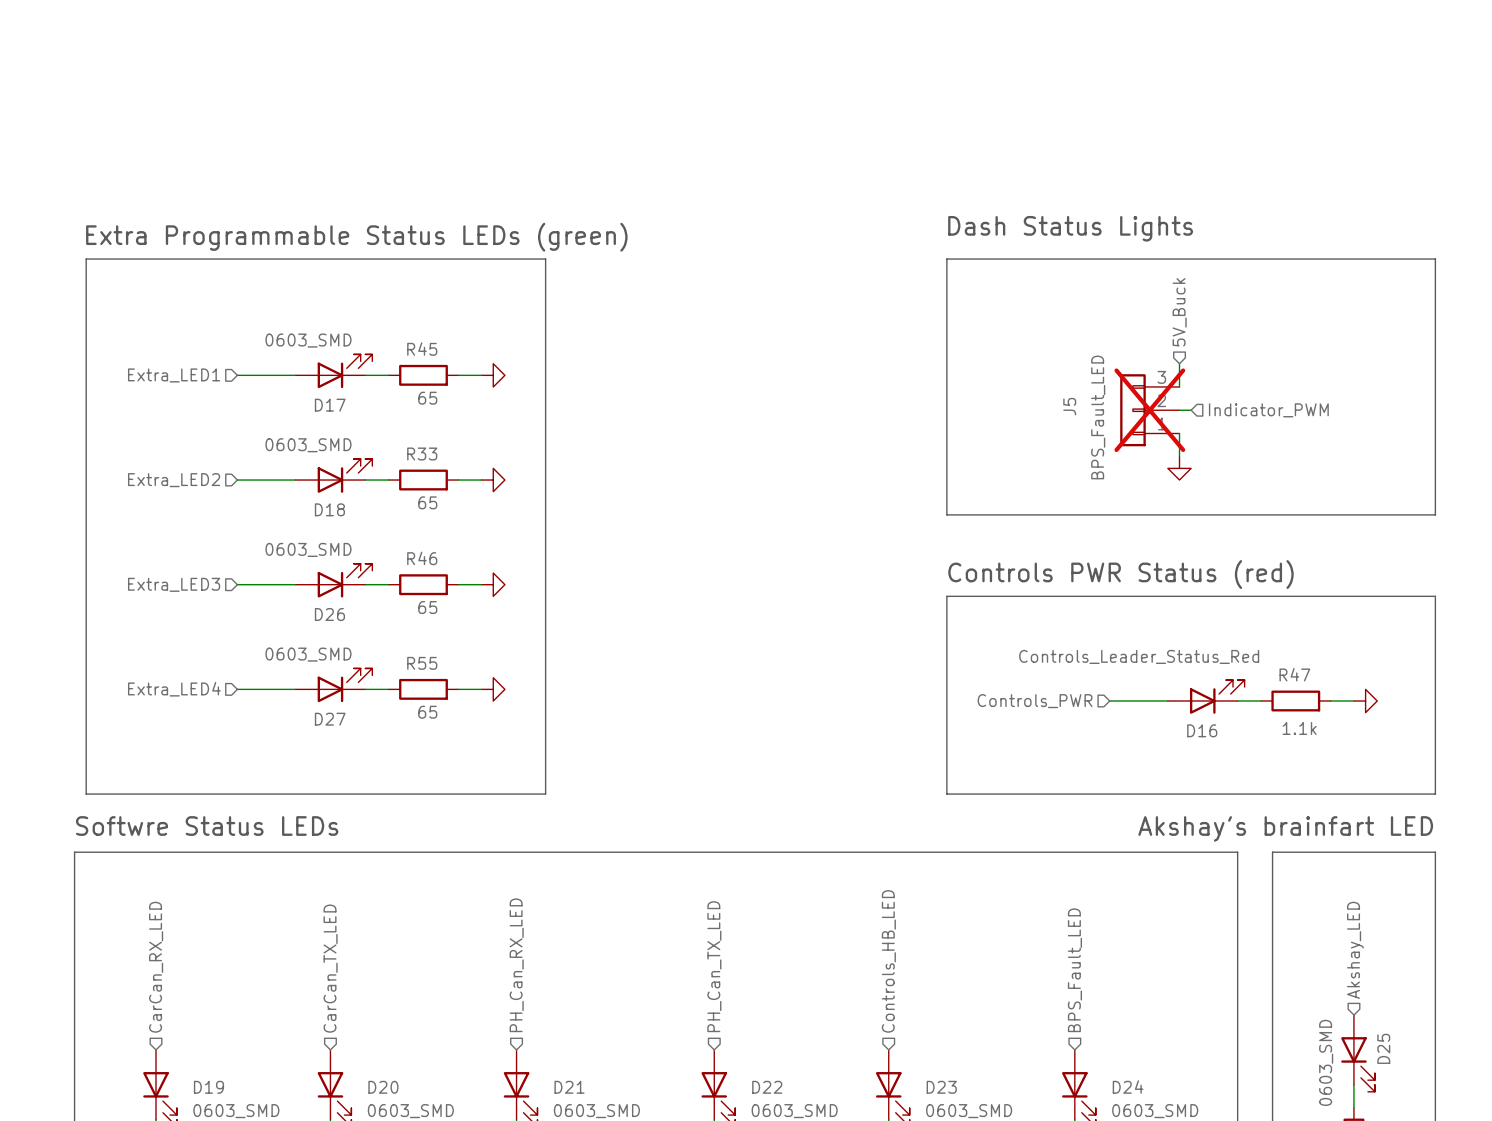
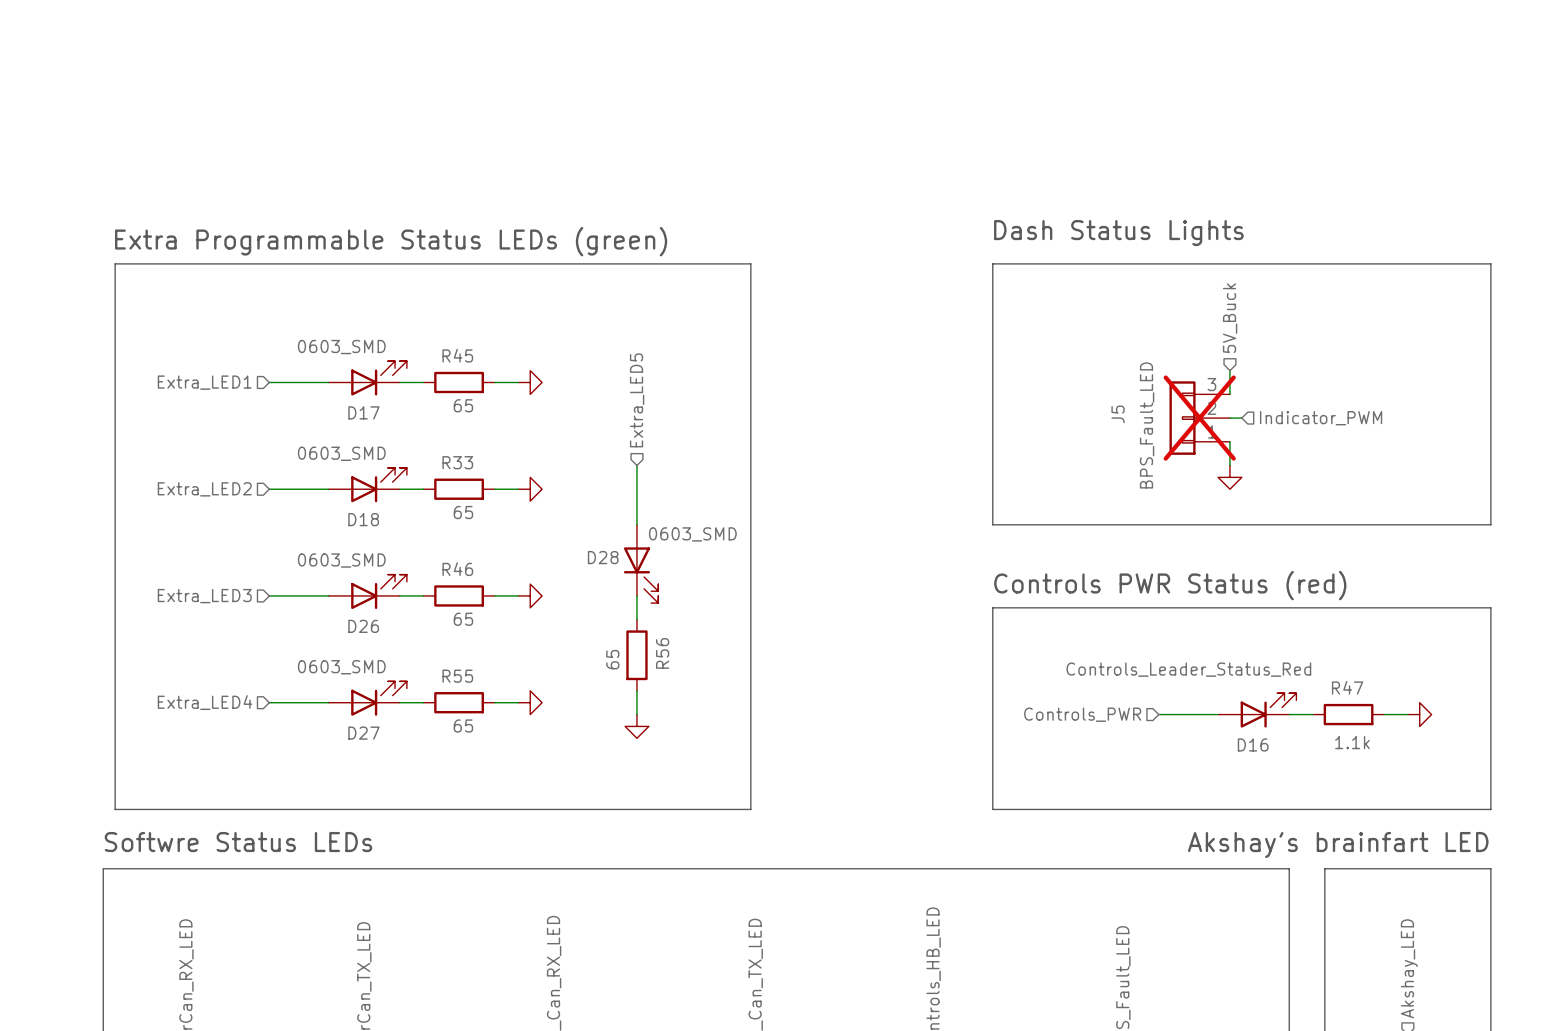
line: (545, 259) (545, 794) -> (583, 263) (750, 263) (750, 809) (583, 809)
hierarchical label: none -> Extra_LED5 (637, 400)
wire: none -> (636, 465) (636, 524)
D28: none -> 0603_SMD (641, 563)
wire: none -> (636, 595) (636, 619)
R56: none -> 65 (636, 655)
wire: none -> (636, 690) (636, 714)
power symbol: none -> (636, 726)

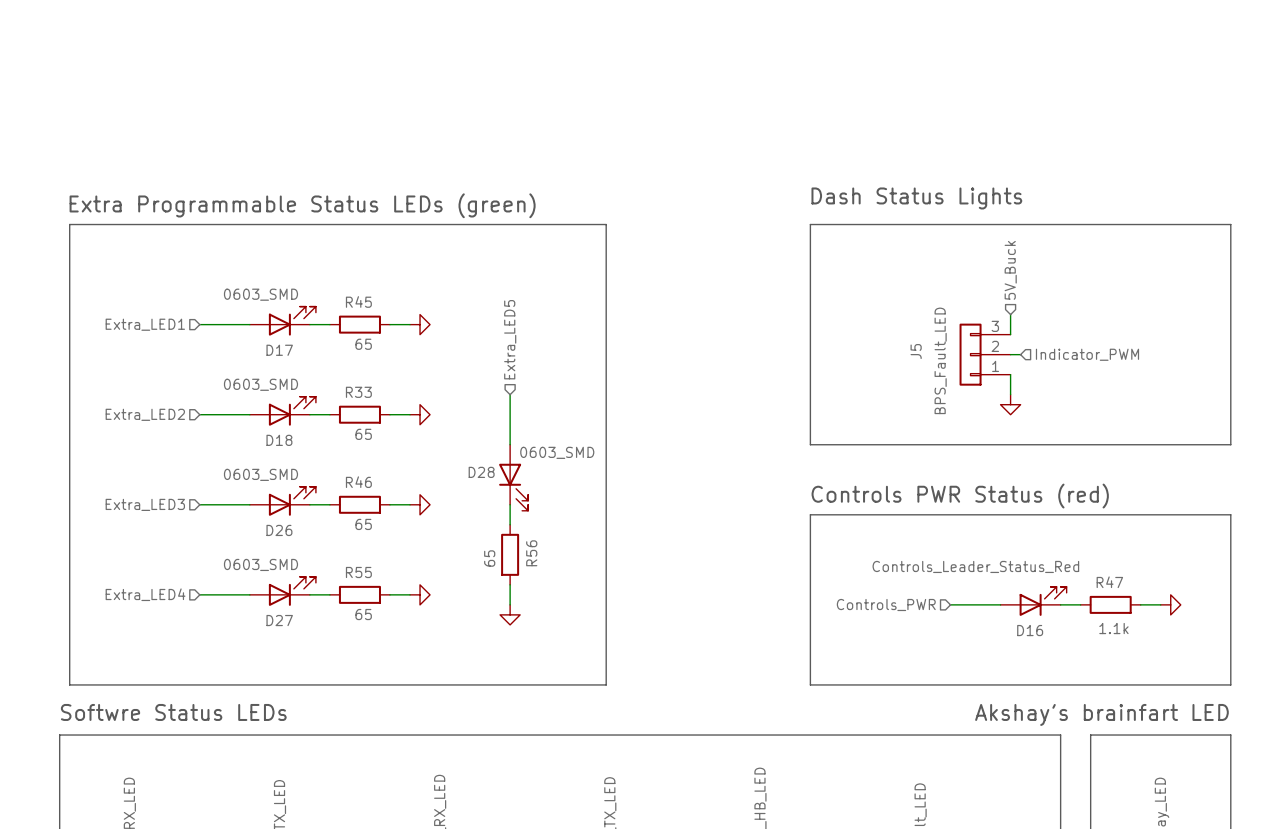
J5 do-not-place cross: (1199, 418) -> none

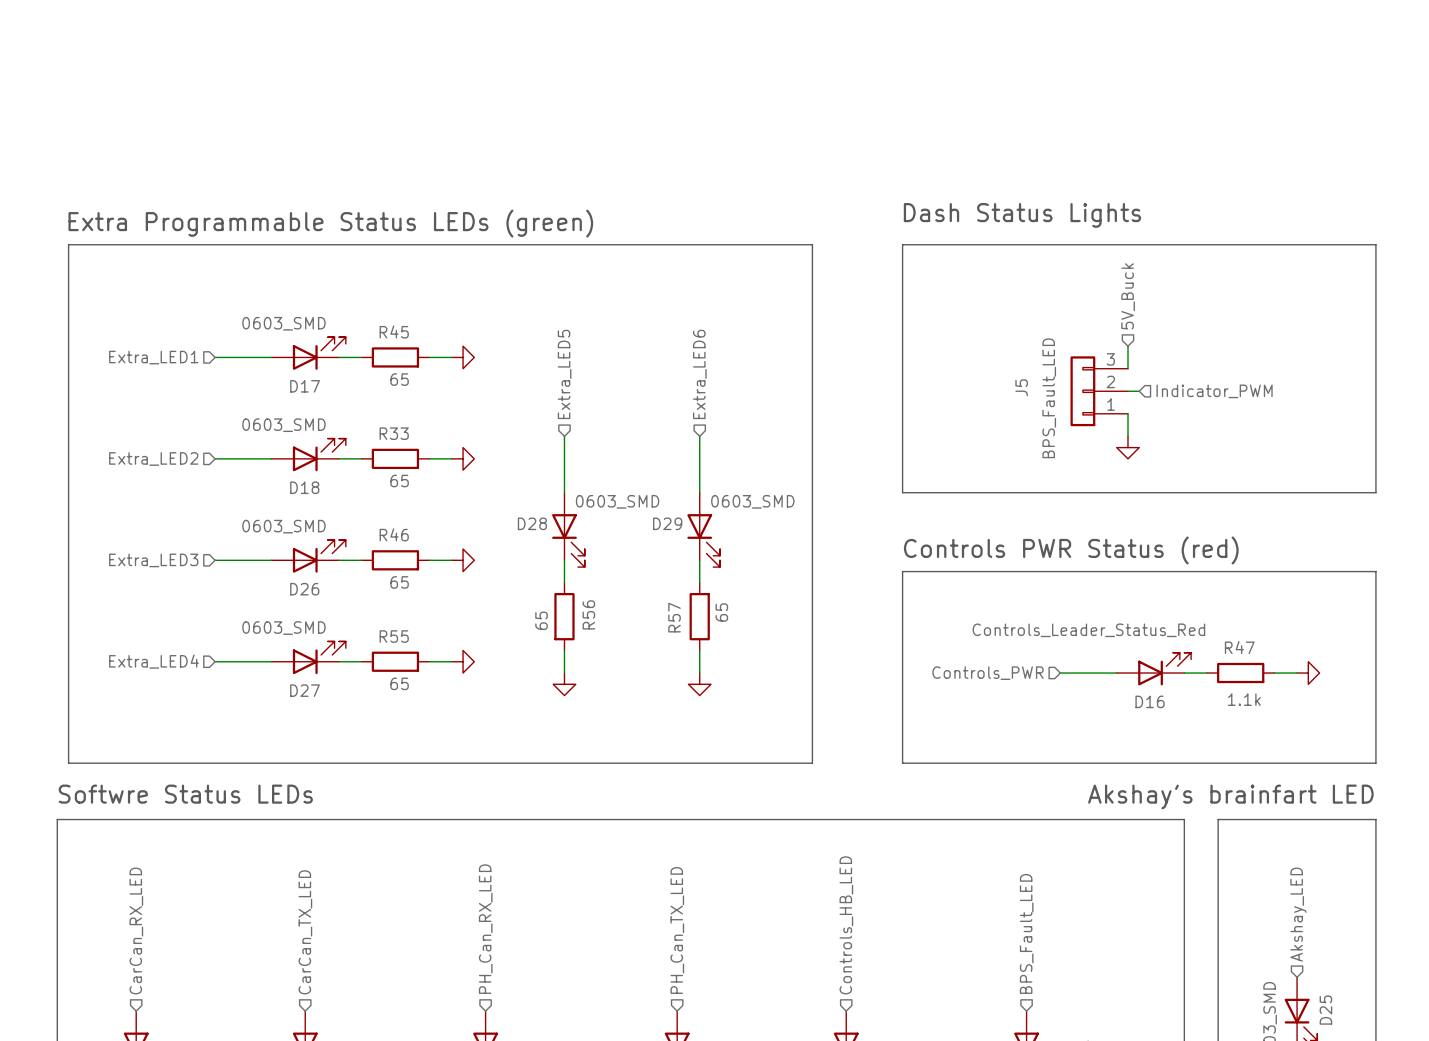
line: (606, 224) (606, 684) -> (672, 244) (812, 244) (812, 763) (672, 763)
hierarchical label: none -> Extra_LED6 (699, 374)
wire: none -> (699, 436) (699, 492)
D29: none -> 0603_SMD (703, 529)
wire: none -> (699, 560) (699, 582)
R57: none -> 65 (699, 616)
wire: none -> (699, 650) (699, 673)
power symbol: none -> (699, 684)

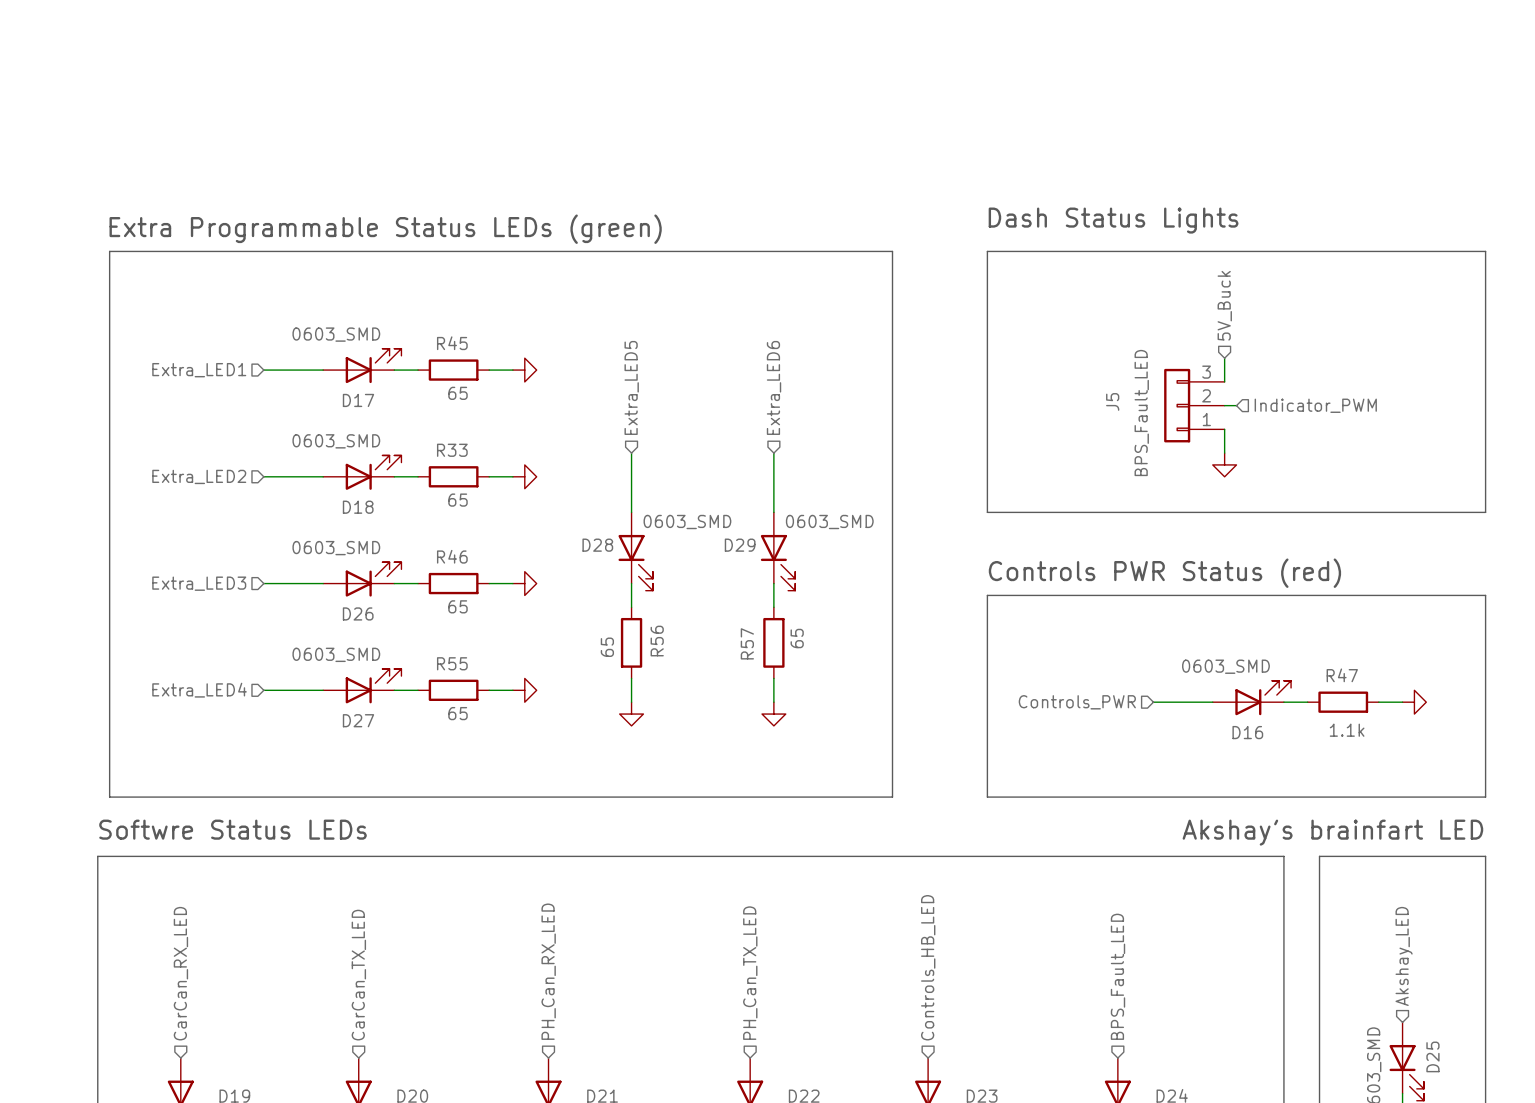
D16 value: Controls_Leader_Status_Red (1088, 630) -> 0603_SMD (1225, 666)

